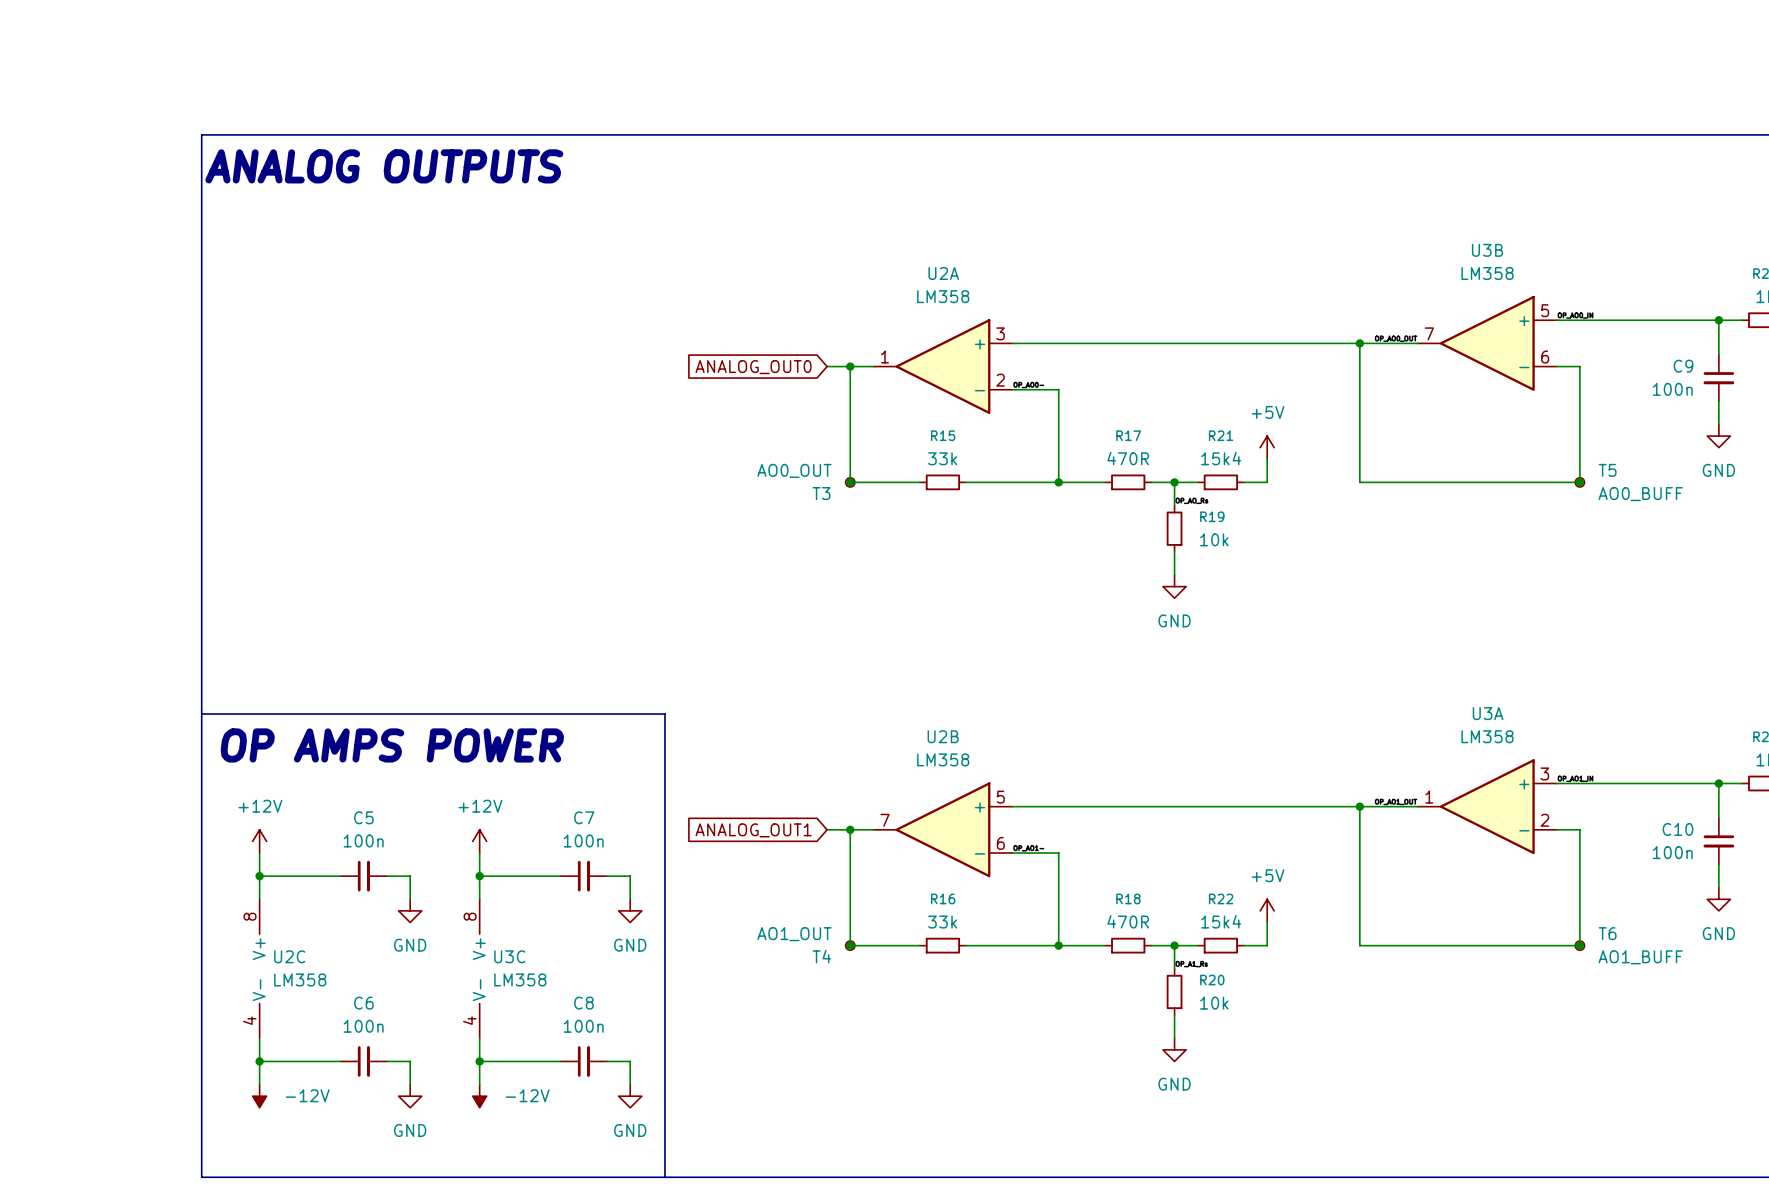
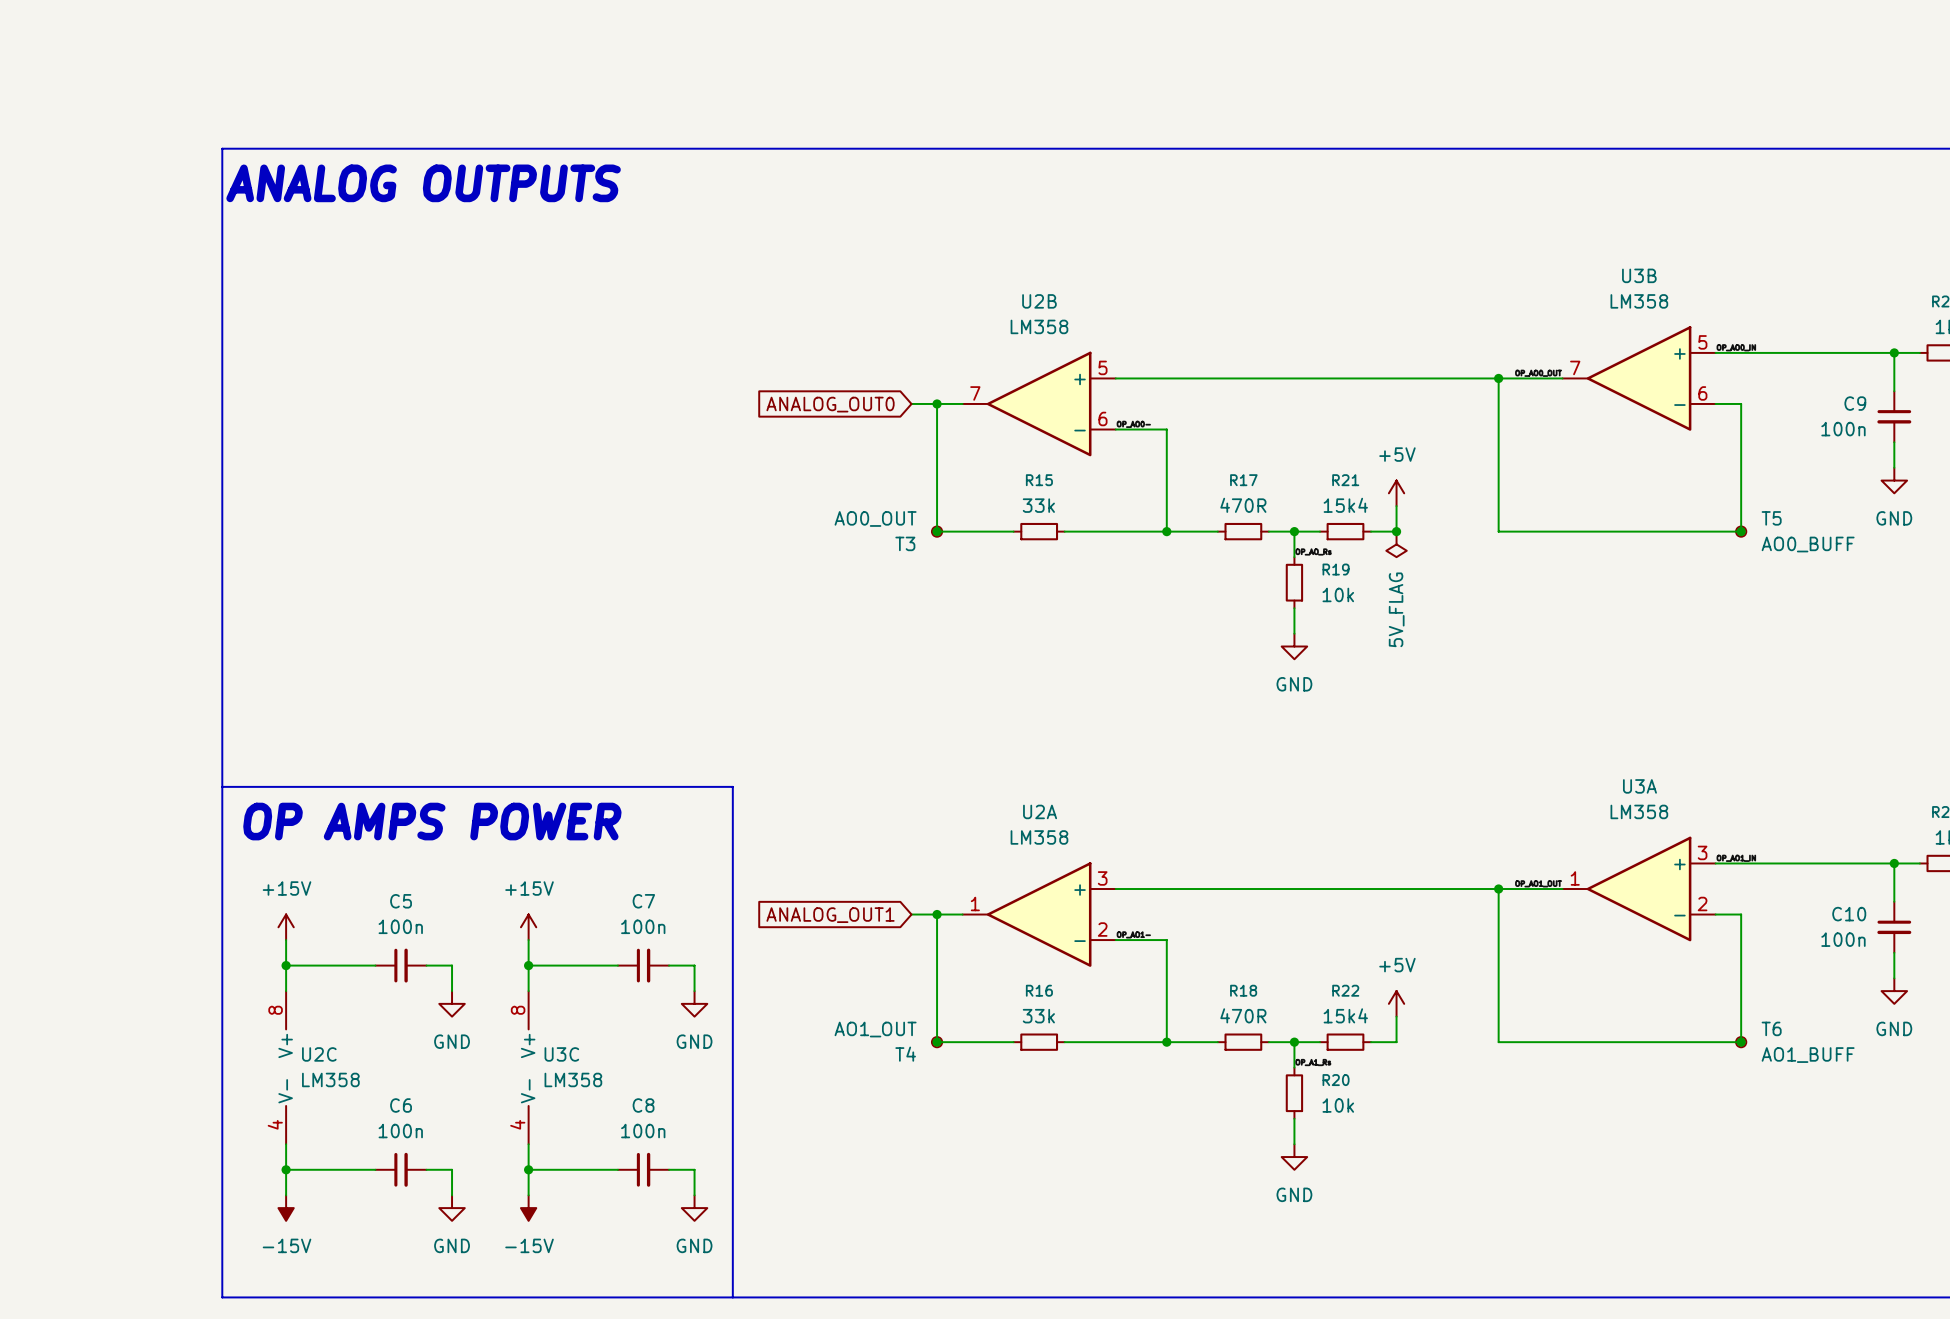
U2A position: (942, 366) -> (1039, 914)
junction: none -> (1396, 531)
power symbol: none -> 5V_FLAG (1396, 544)
U2B position: (942, 829) -> (1039, 403)
power symbol: +12V (259, 841) -> +15V (286, 927)
power symbol: +12V (479, 841) -> +15V (528, 927)
power symbol: -12V (259, 1096) -> -15V (286, 1208)
power symbol: -12V (479, 1096) -> -15V (528, 1208)

